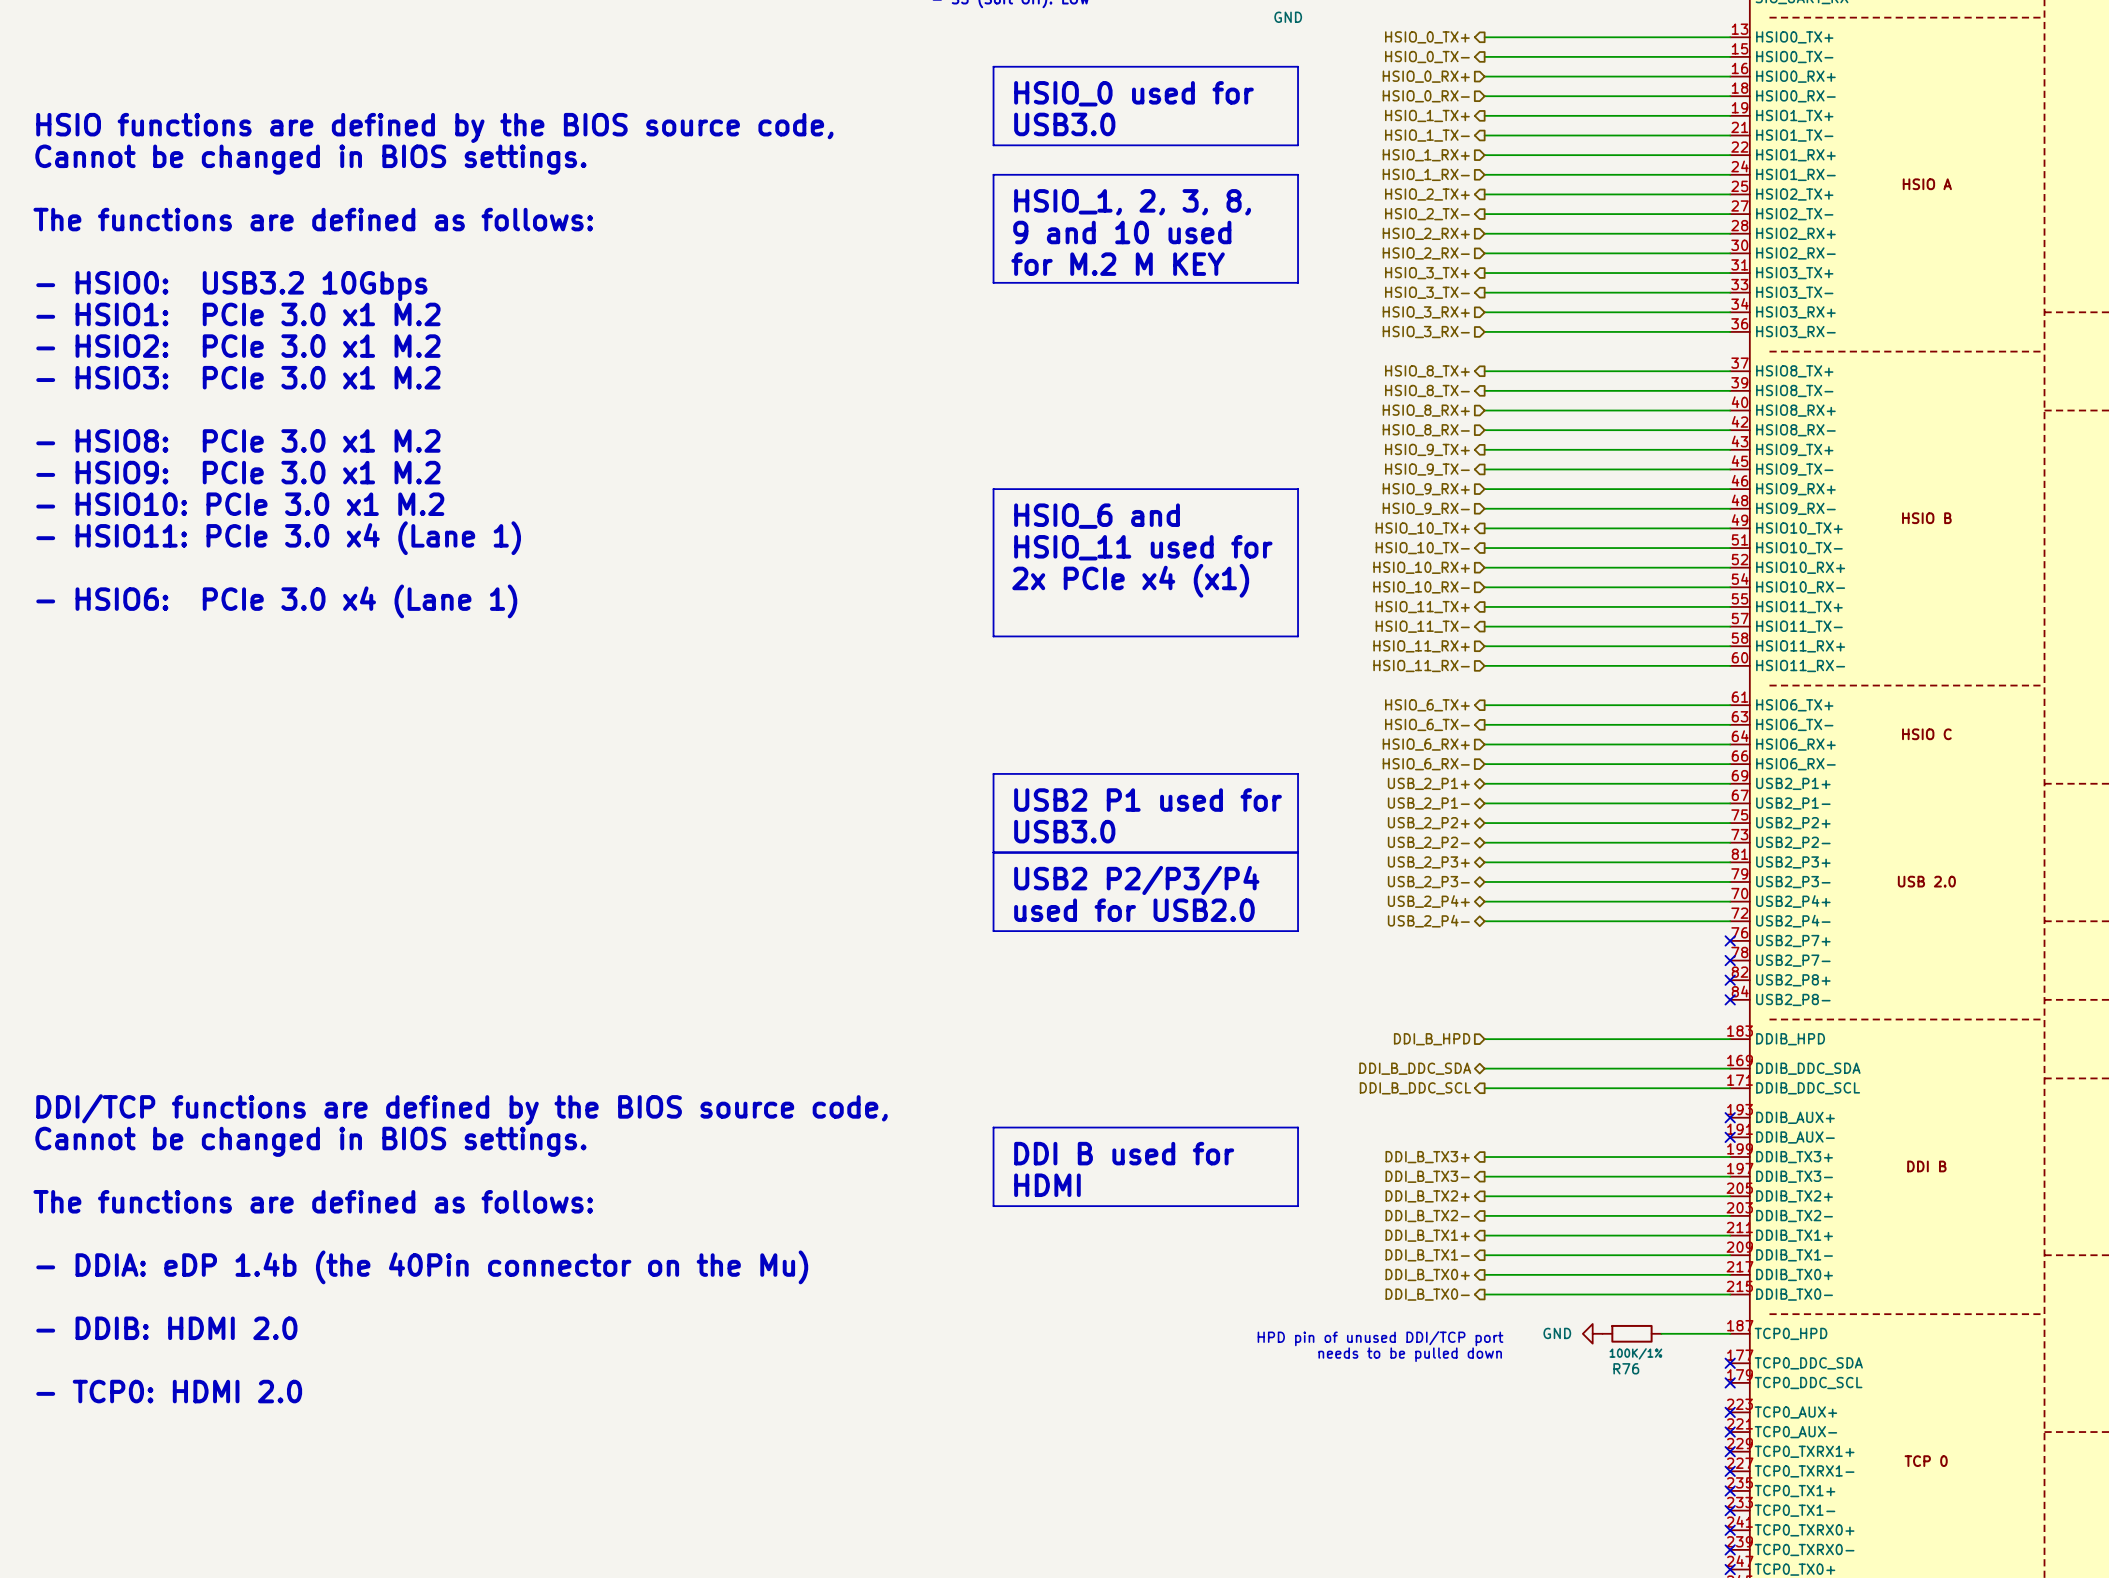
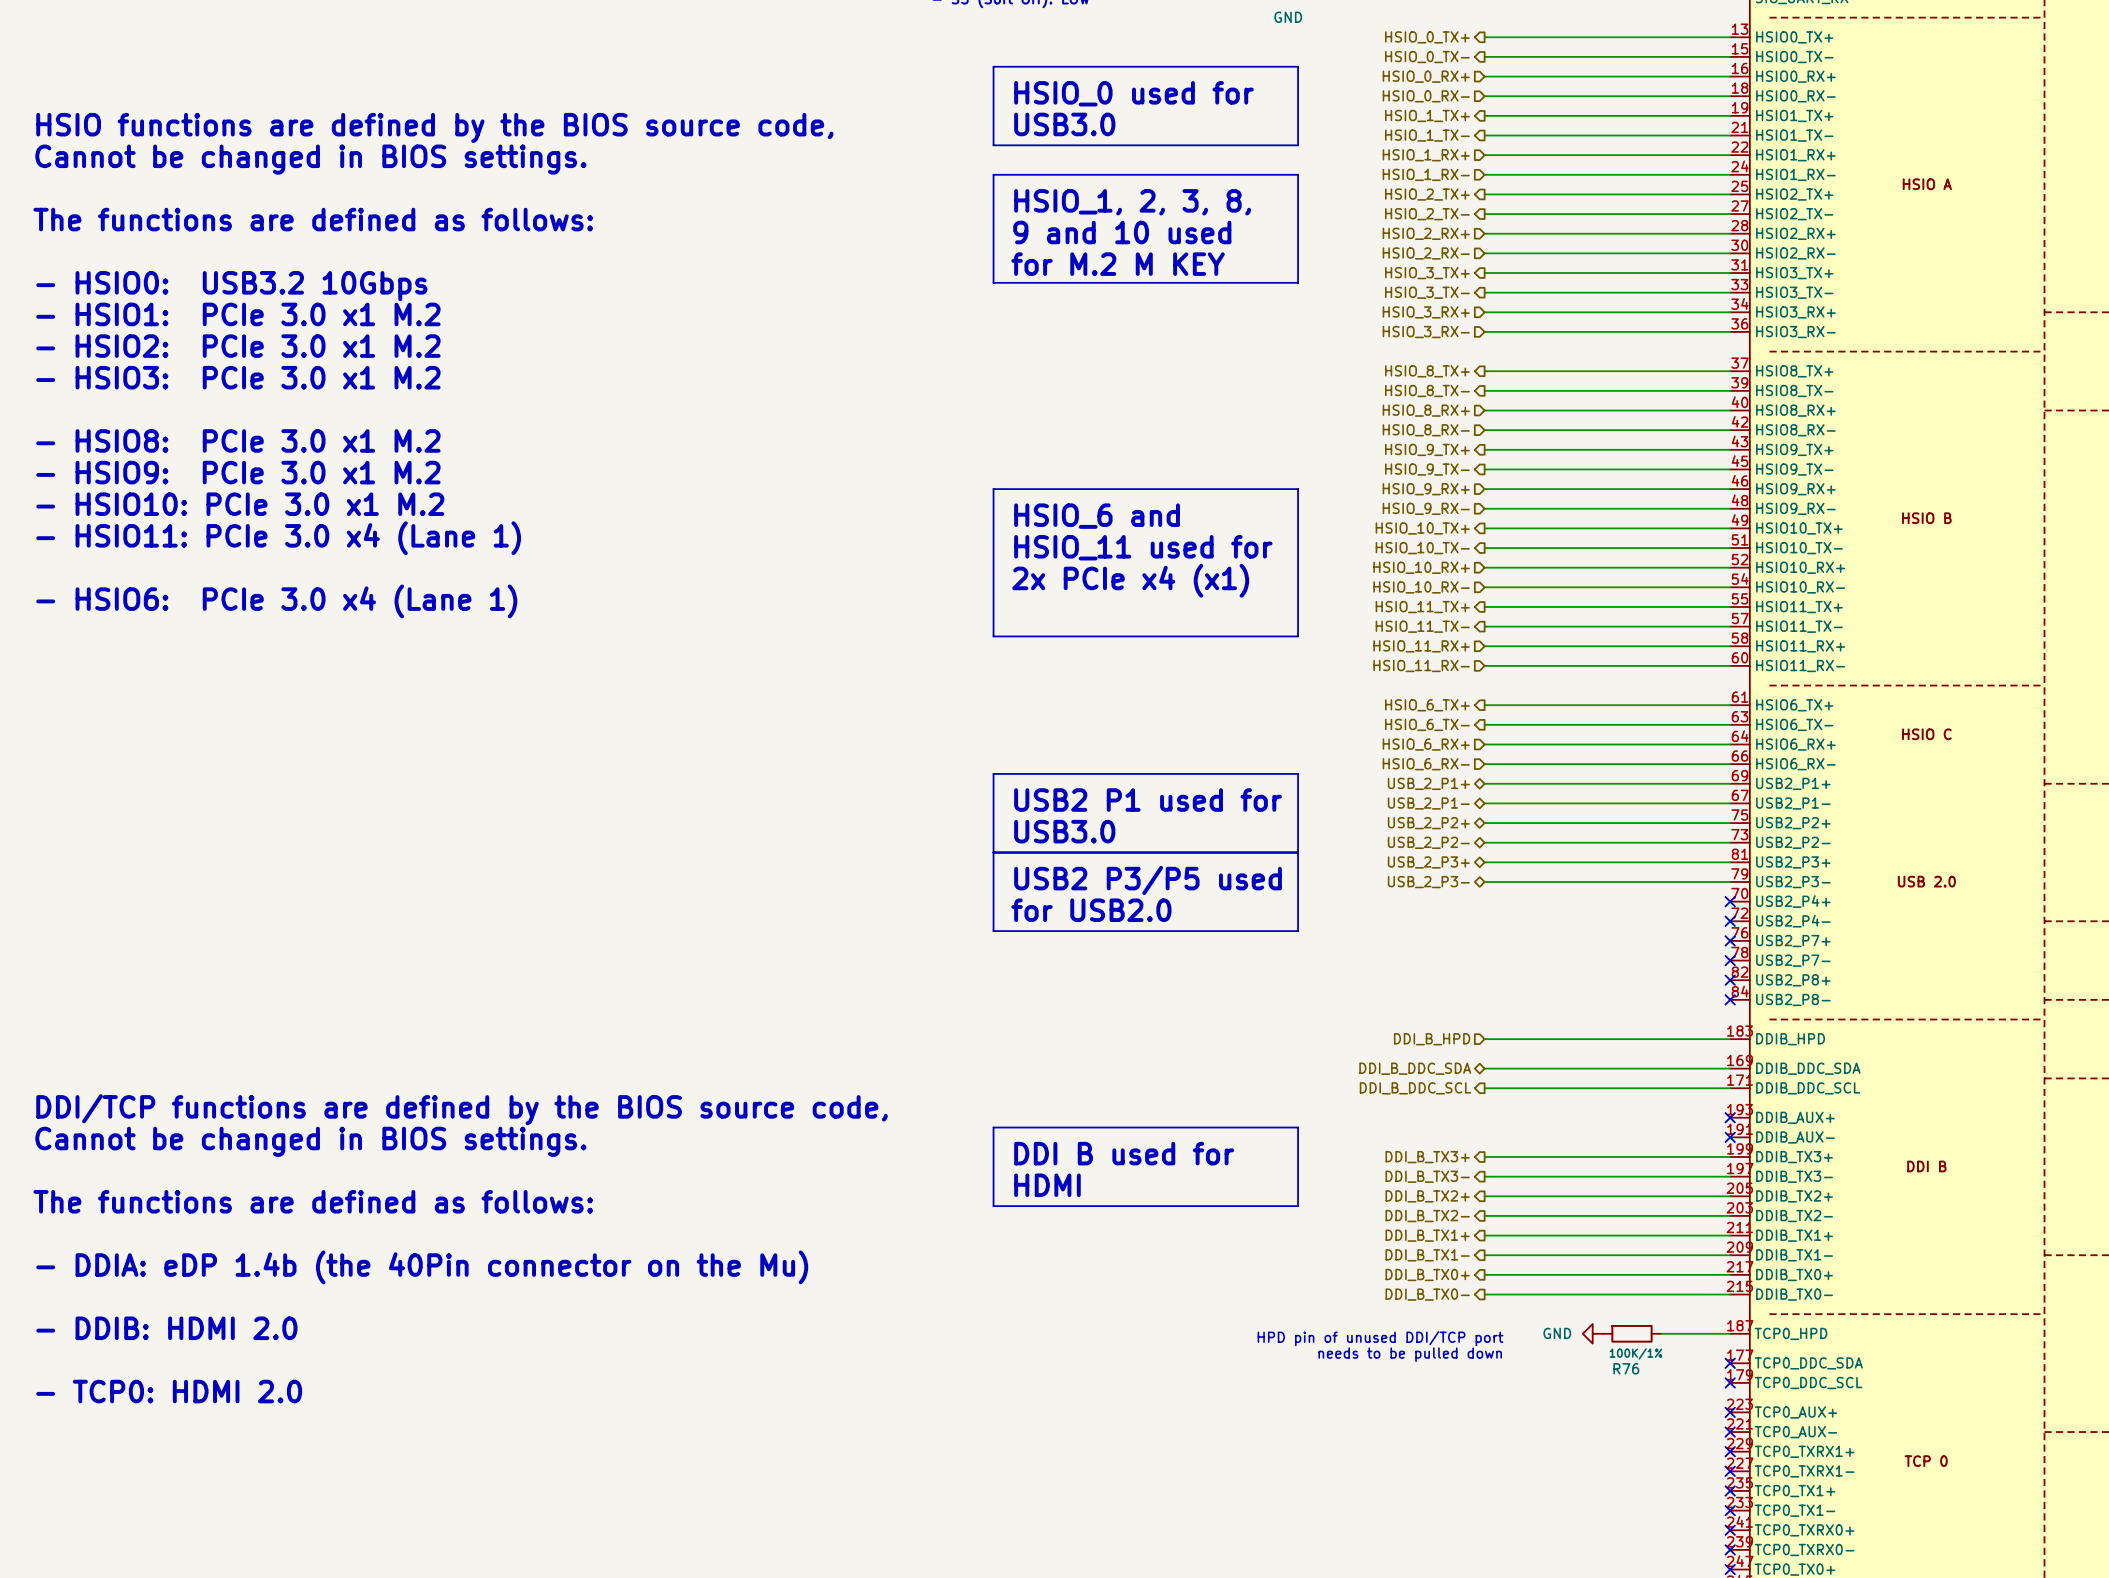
text: USB2 P2/P3/P4 (1136, 880) -> USB2 P3/P5 used (1148, 880)
hierarchical label: USB_2_P4+ (1428, 901) -> none
wire: (1484, 901) (1730, 901) -> none
no-connect mark: none -> (1730, 901)
text: used for USB2.0 (1134, 910) -> for USB2.0 (1091, 910)
hierarchical label: USB_2_P4- (1428, 921) -> none
wire: (1484, 921) (1730, 921) -> none
no-connect mark: none -> (1730, 921)

